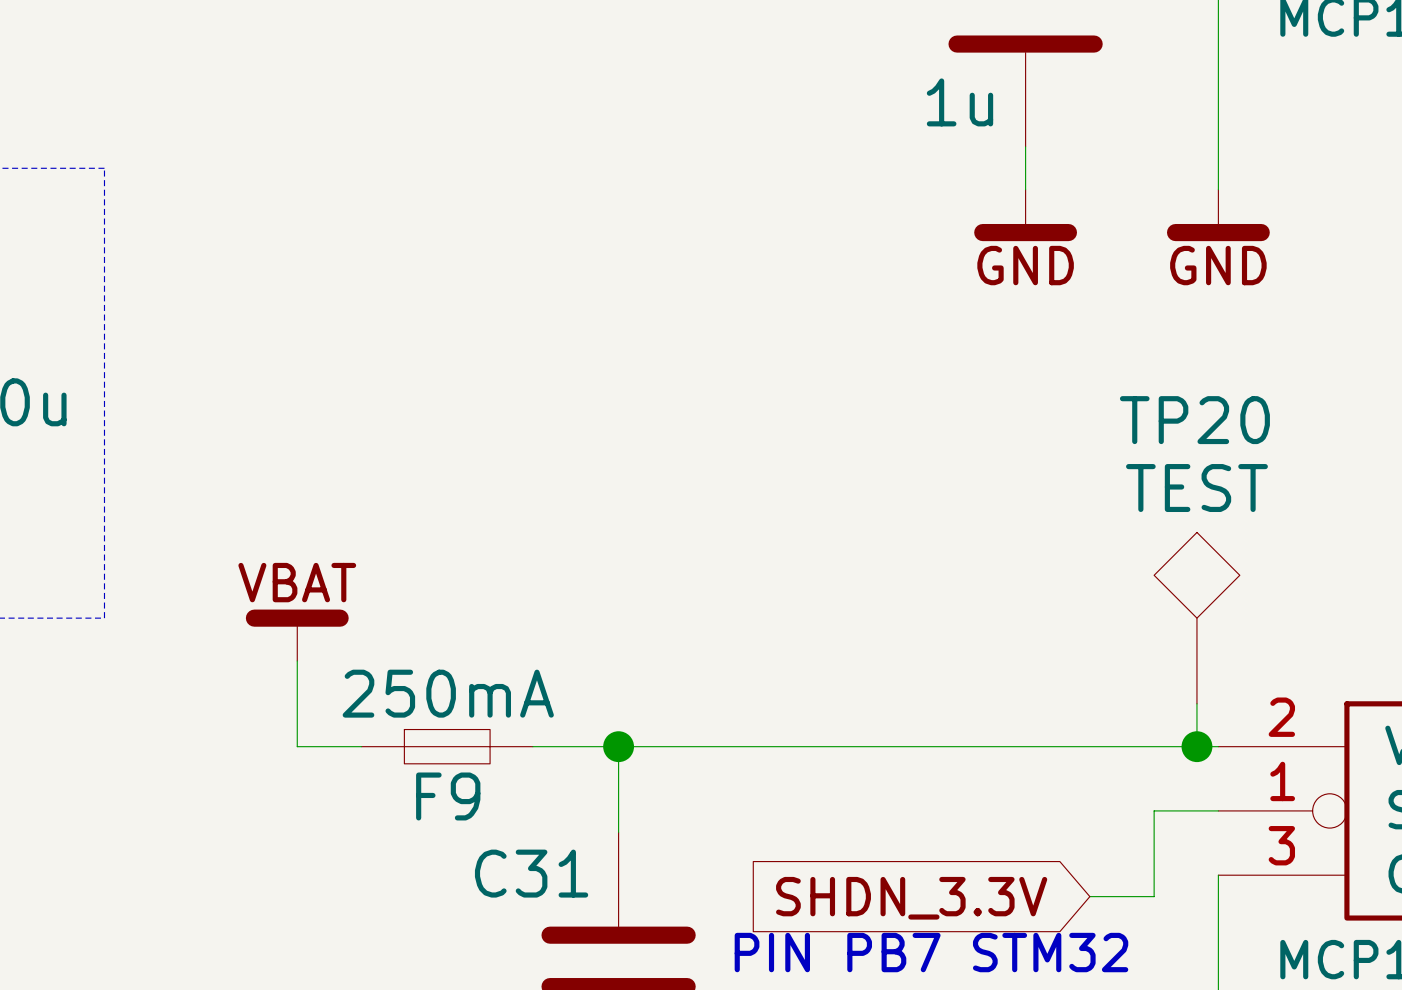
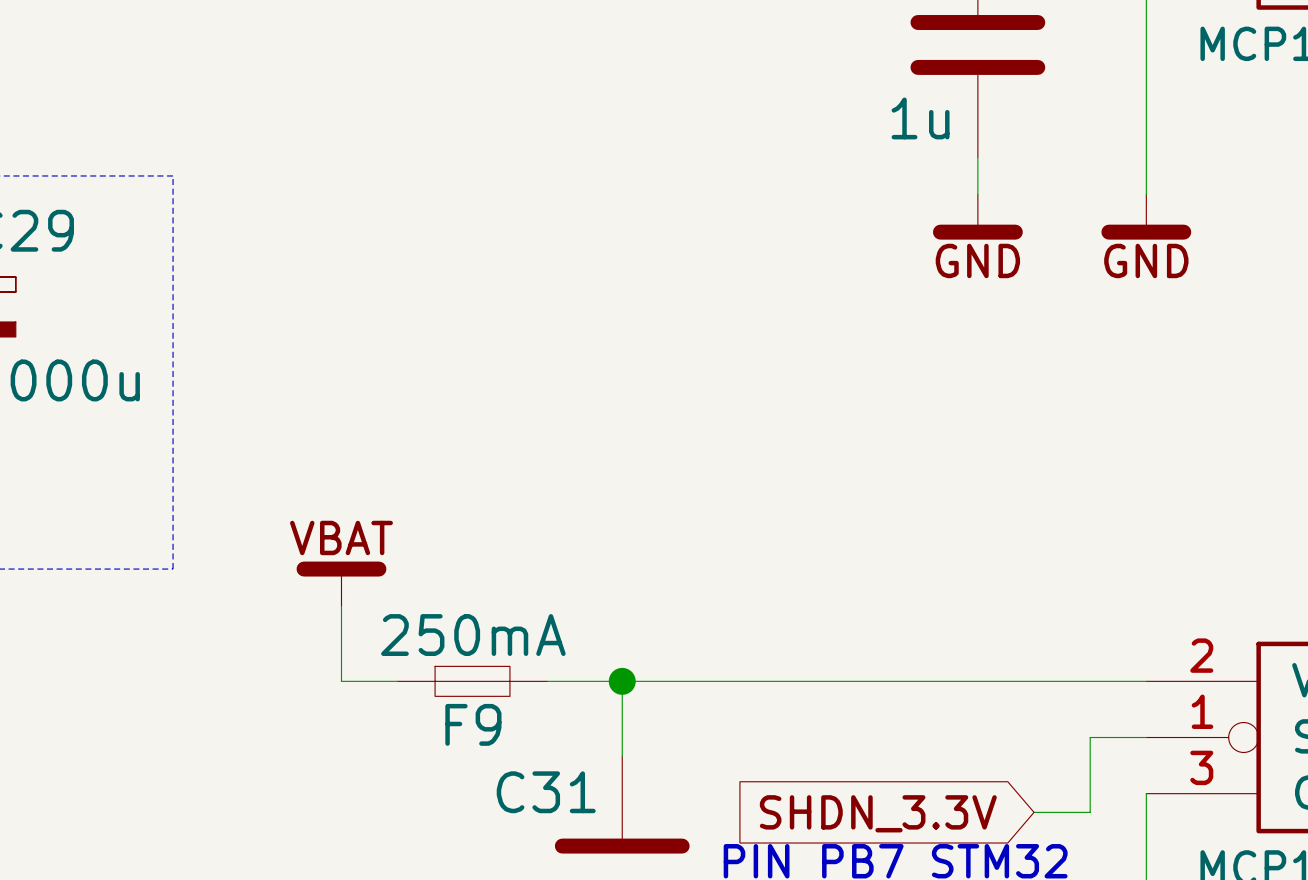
TP20: TEST (1196, 618) -> none
wire: (1196, 703) (1196, 746) -> none
junction: (1196, 746) -> none

